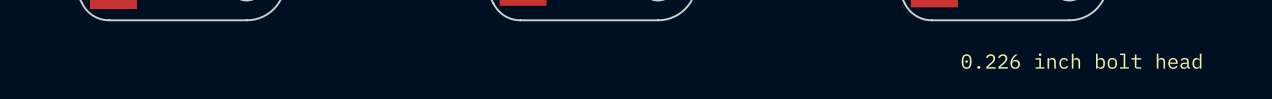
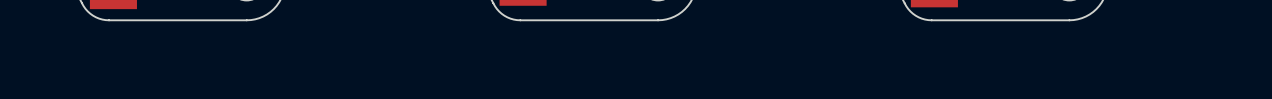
text: 0.226 inch bolt head (1081, 61) -> none

